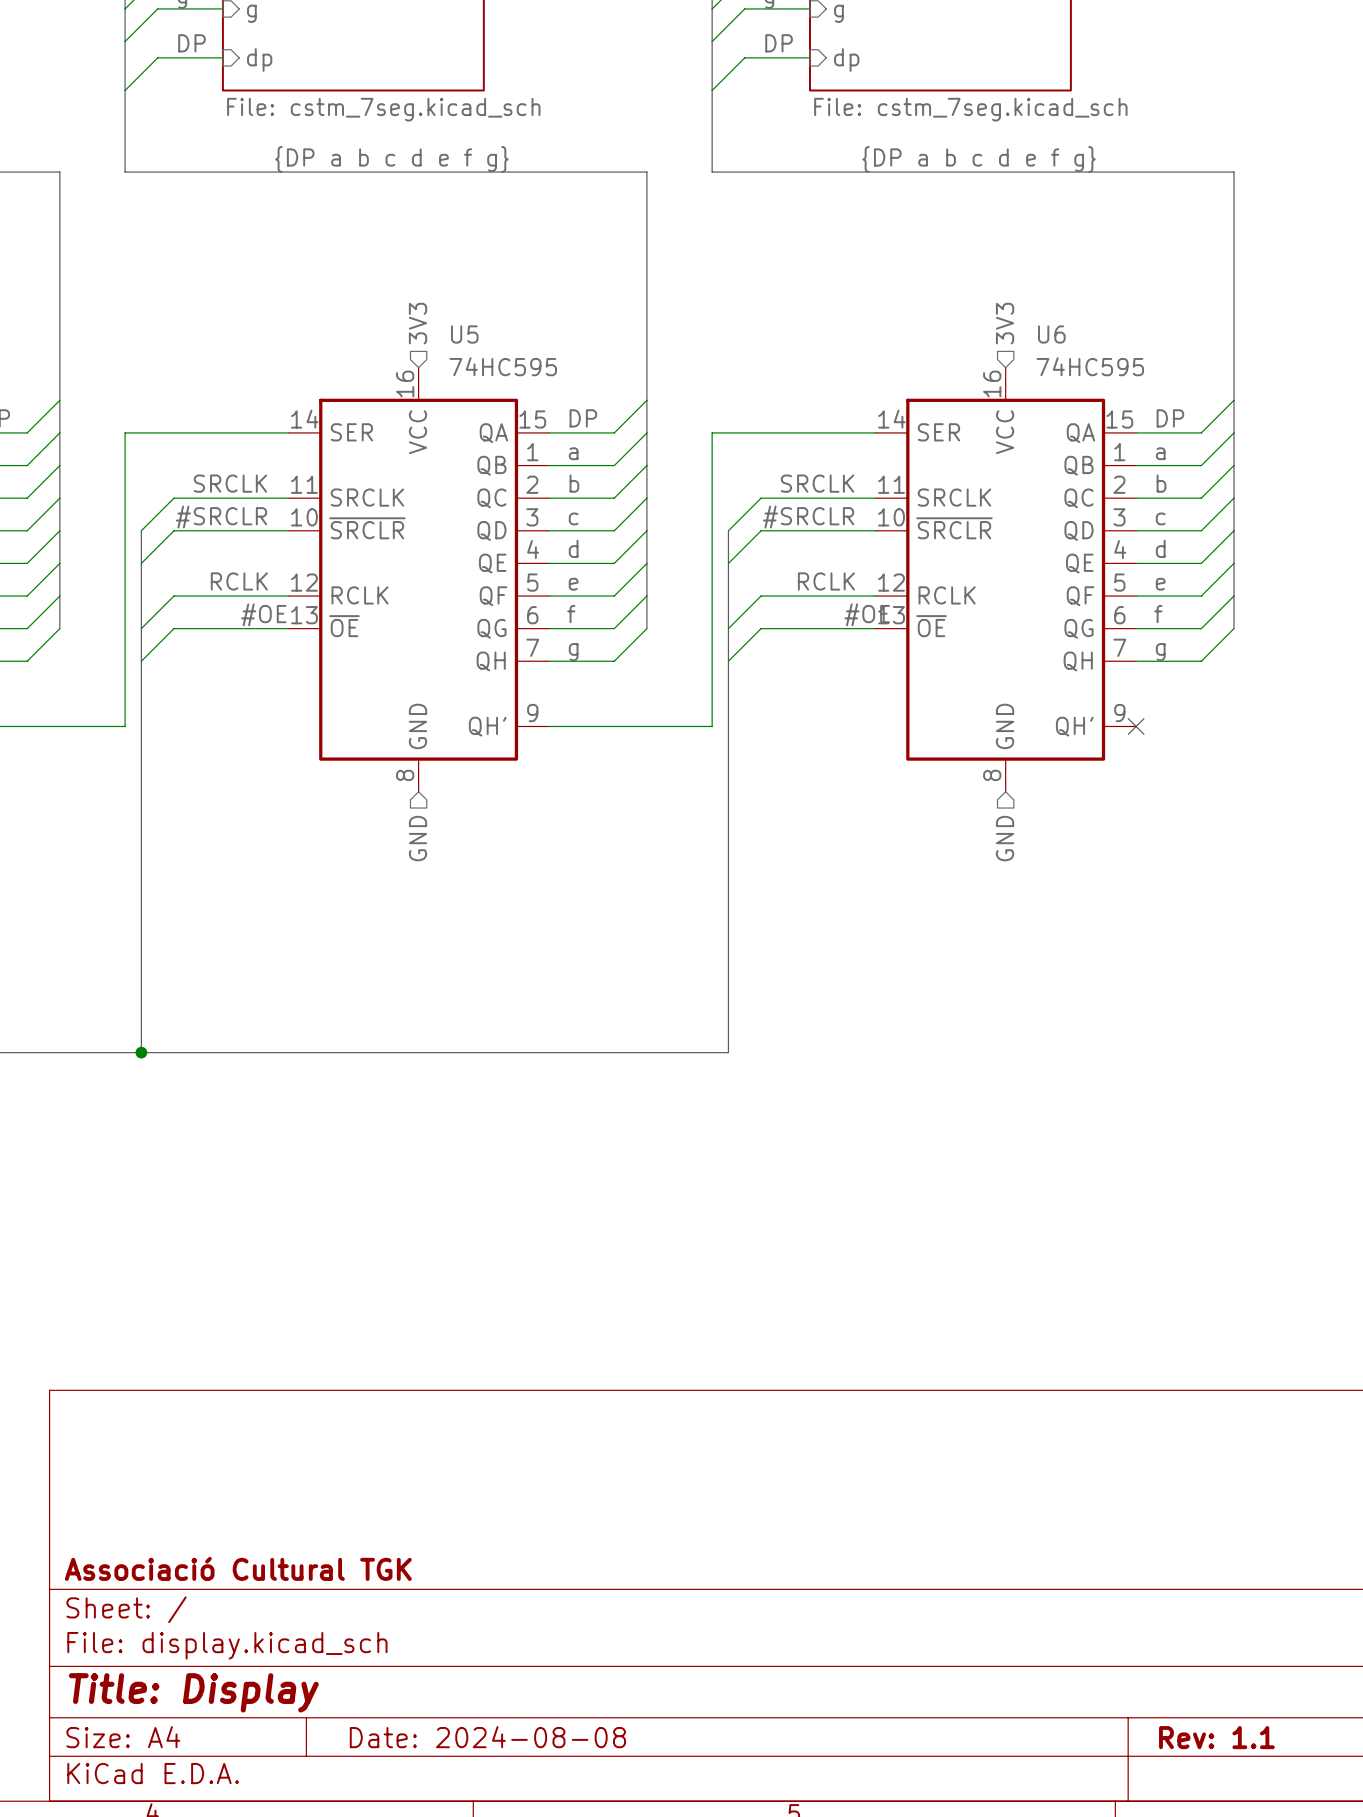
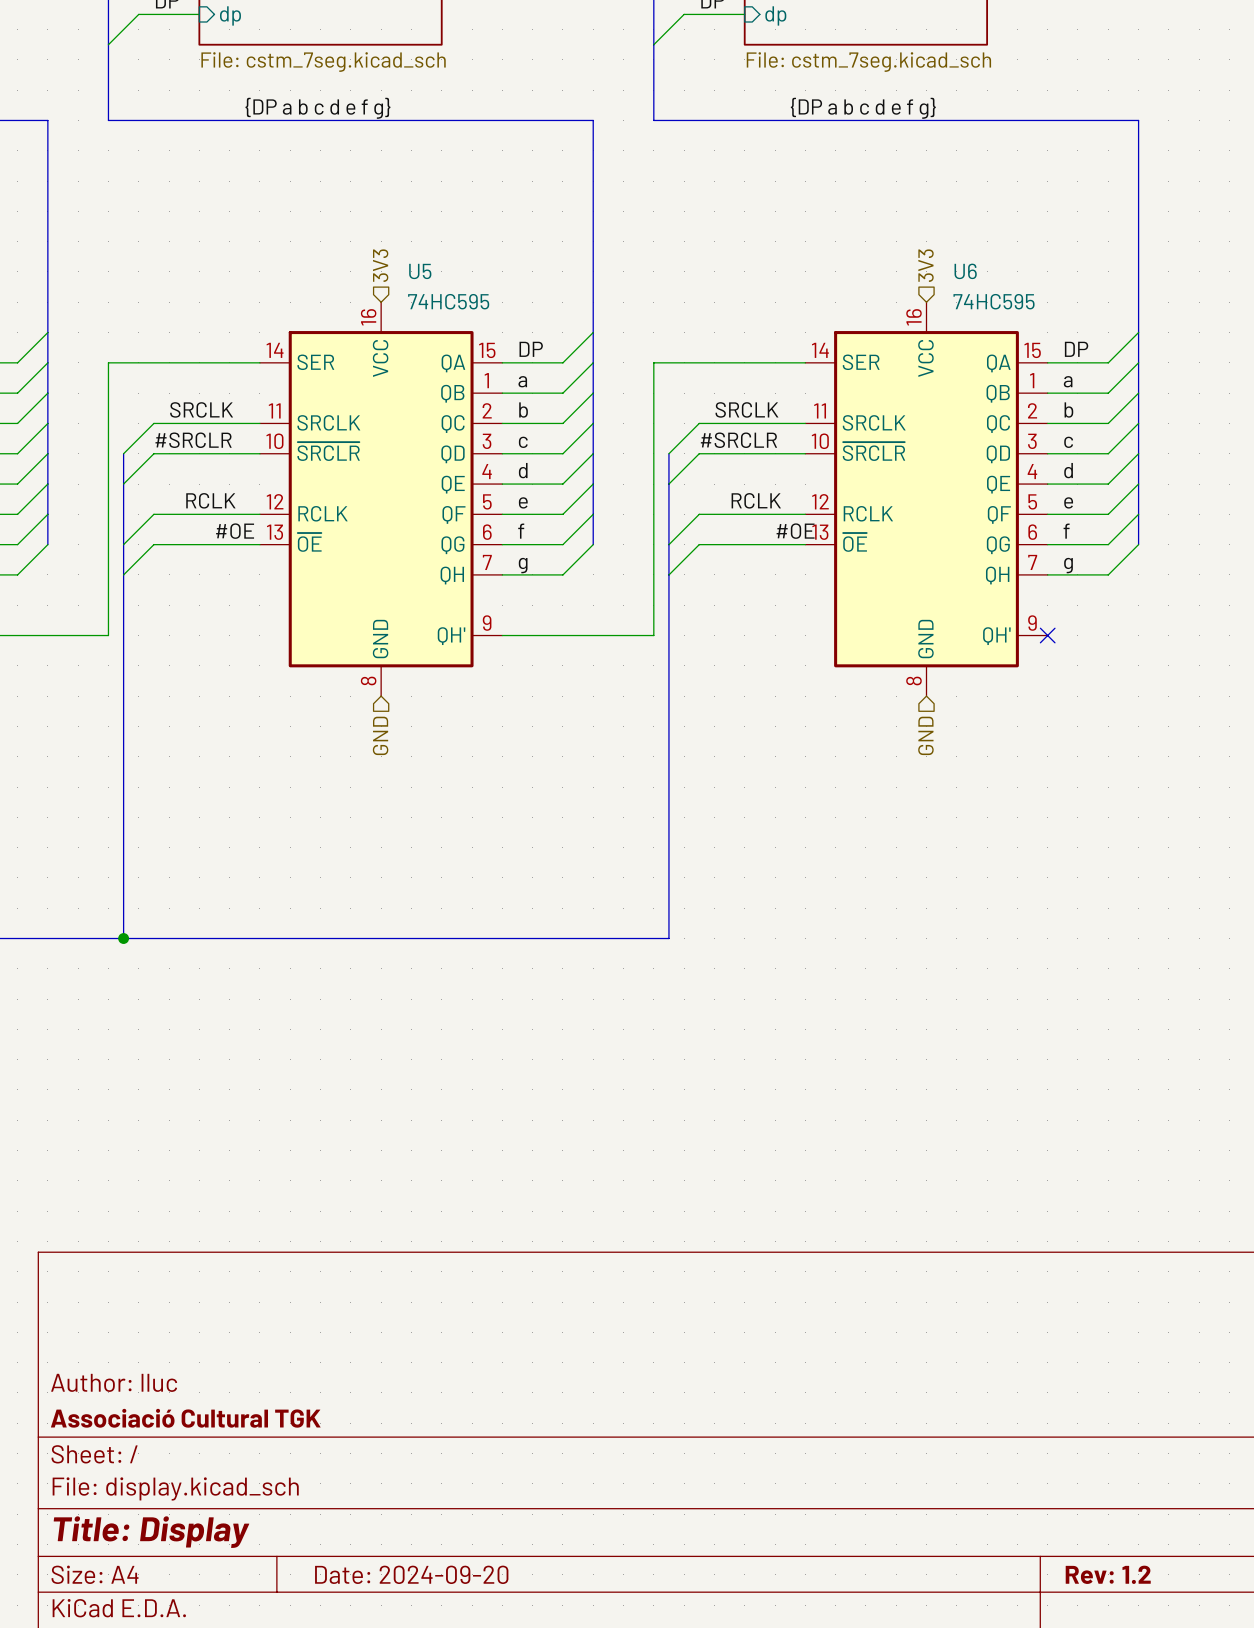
title block: none -> Author: lluc (114, 1382)
title block: Date: 2024-08-08 (487, 1737) -> Date: 2024-09-20 (411, 1574)
title block: Rev: 1.1 (1216, 1737) -> Rev: 1.2 (1108, 1574)

